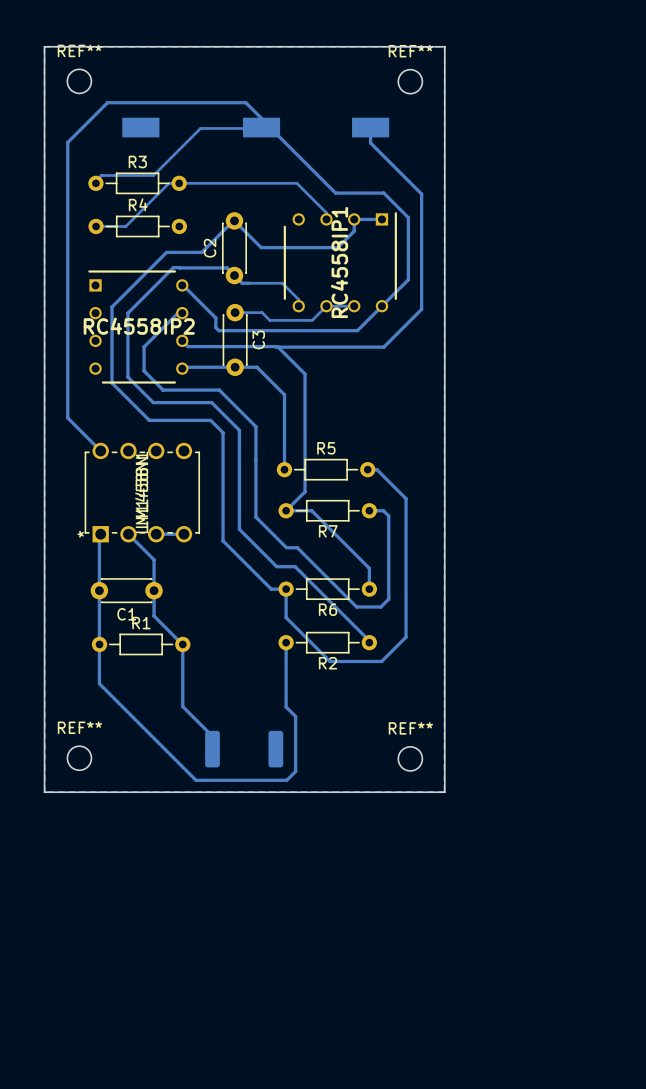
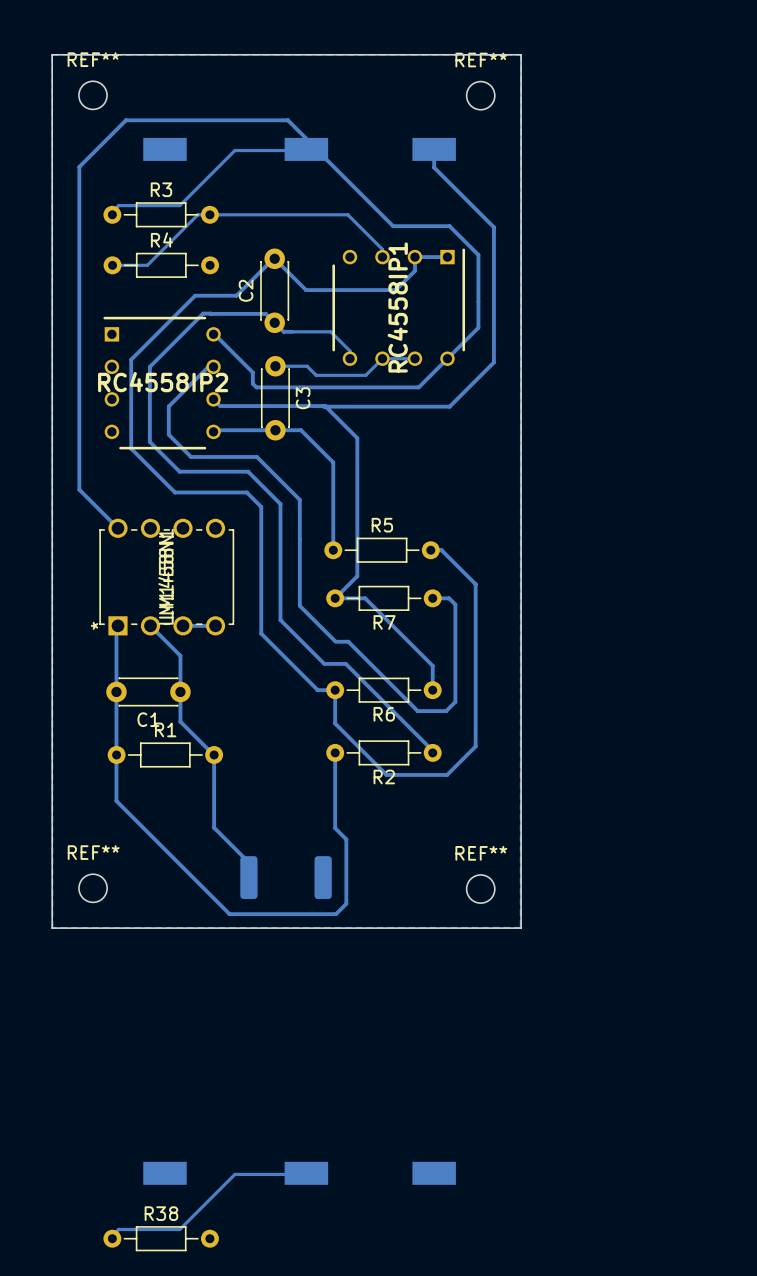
part: none -> (164, 1173)
part: none -> (306, 1173)
bottom track: none -> (317, 1173) (234, 1174) (179, 1229) (118, 1229) (113, 1234)
part: none -> (434, 1173)
R38: none -> (161, 1238)

